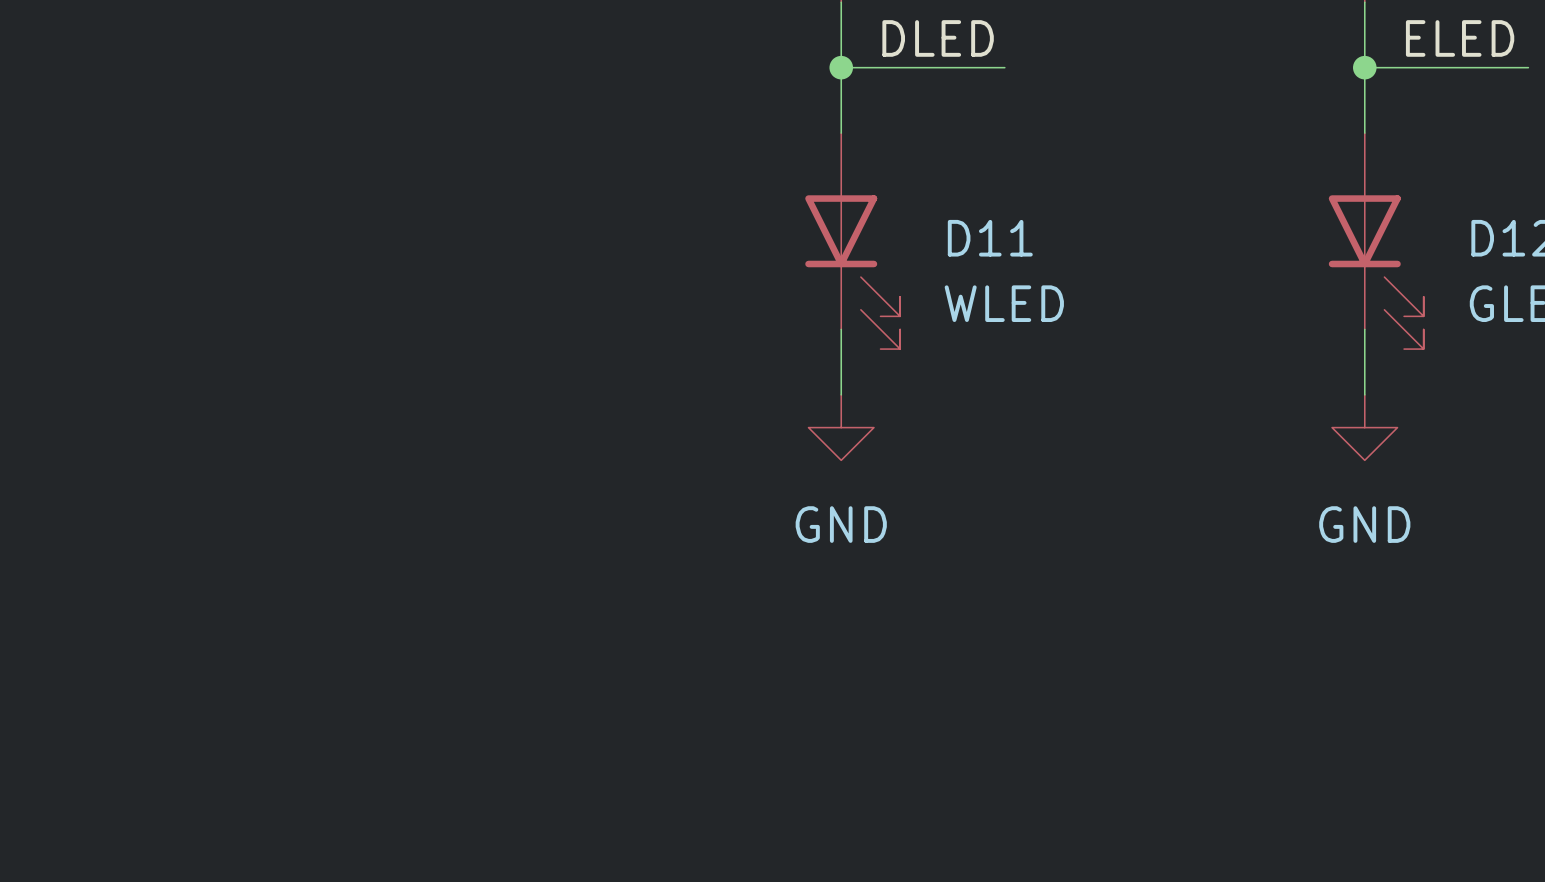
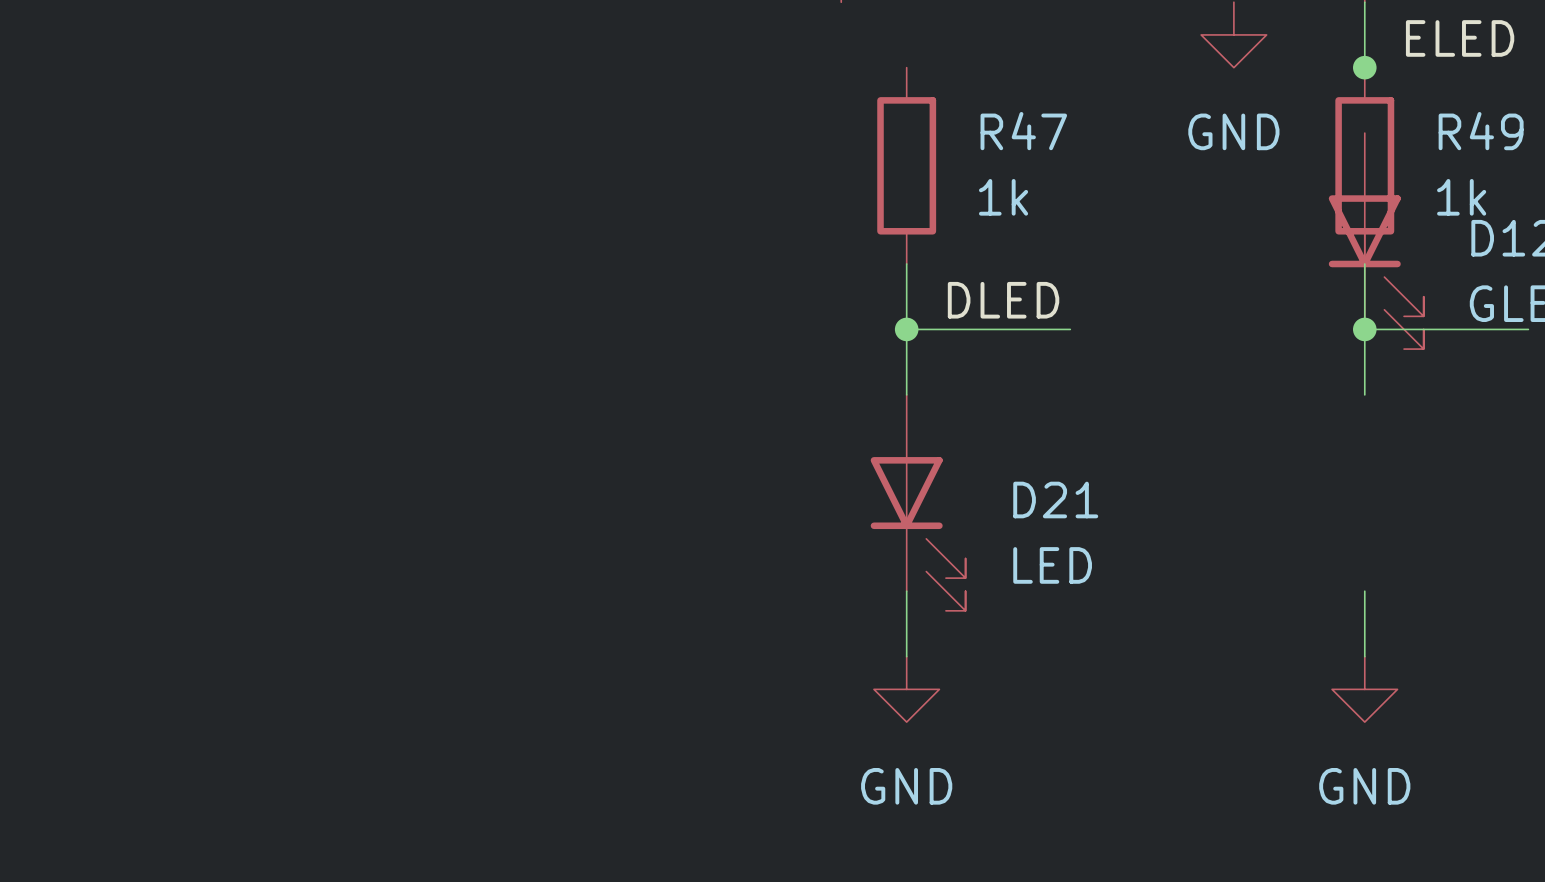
wire: (841, 2) (841, 133) -> (906, 263) (906, 394)
power symbol: none -> GND (1233, 34)
label position: DLED (938, 38) -> DLED (1003, 300)
wire: (841, 67) (1004, 67) -> (906, 329) (1070, 329)
junction: (841, 67) -> none
wire: (1528, 67) (1364, 67) (1364, 133) -> none
R47: none -> 1k (906, 165)
R49: none -> 1k (1364, 165)
D11: WLED (852, 241) -> none
wire: none -> (1364, 263) (1364, 329) (1528, 329)
wire: (841, 329) (841, 394) -> (906, 591) (906, 656)
junction: none -> (906, 329)
junction: none -> (1364, 329)
power symbol: GND (841, 427) -> none
power symbol: GND (1364, 427) -> none
D21: none -> LED (918, 502)
wire: none -> (1364, 591) (1364, 656)
power symbol: none -> GND (906, 689)
power symbol: none -> GND (1364, 689)

